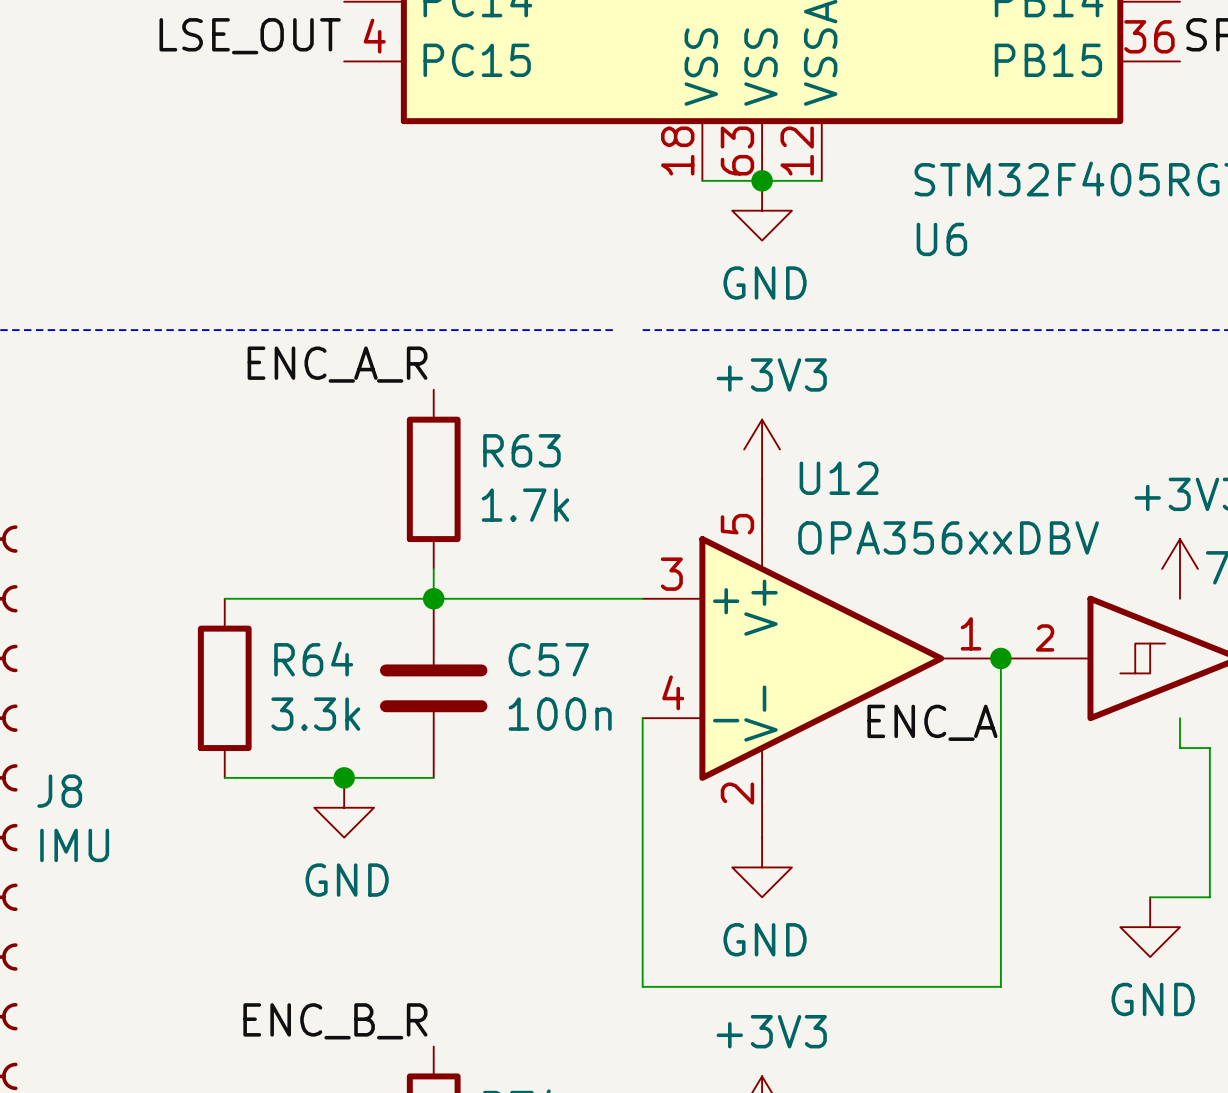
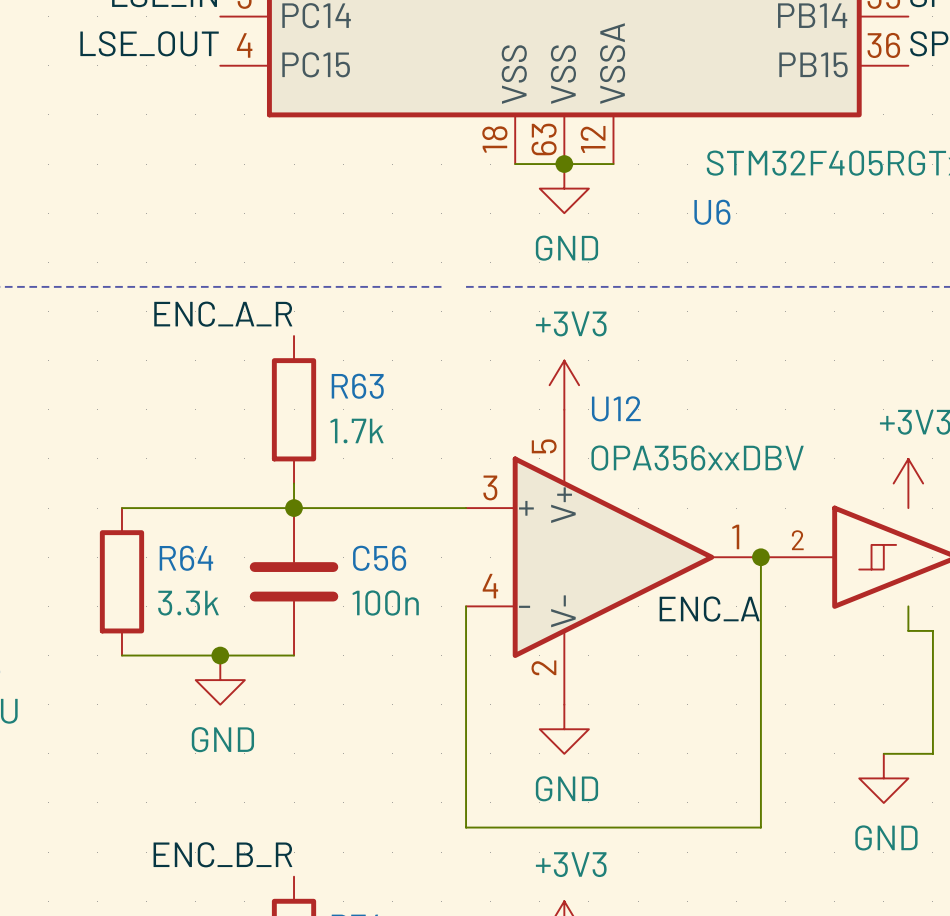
C57 name: C57 (548, 659) -> C56 (379, 558)

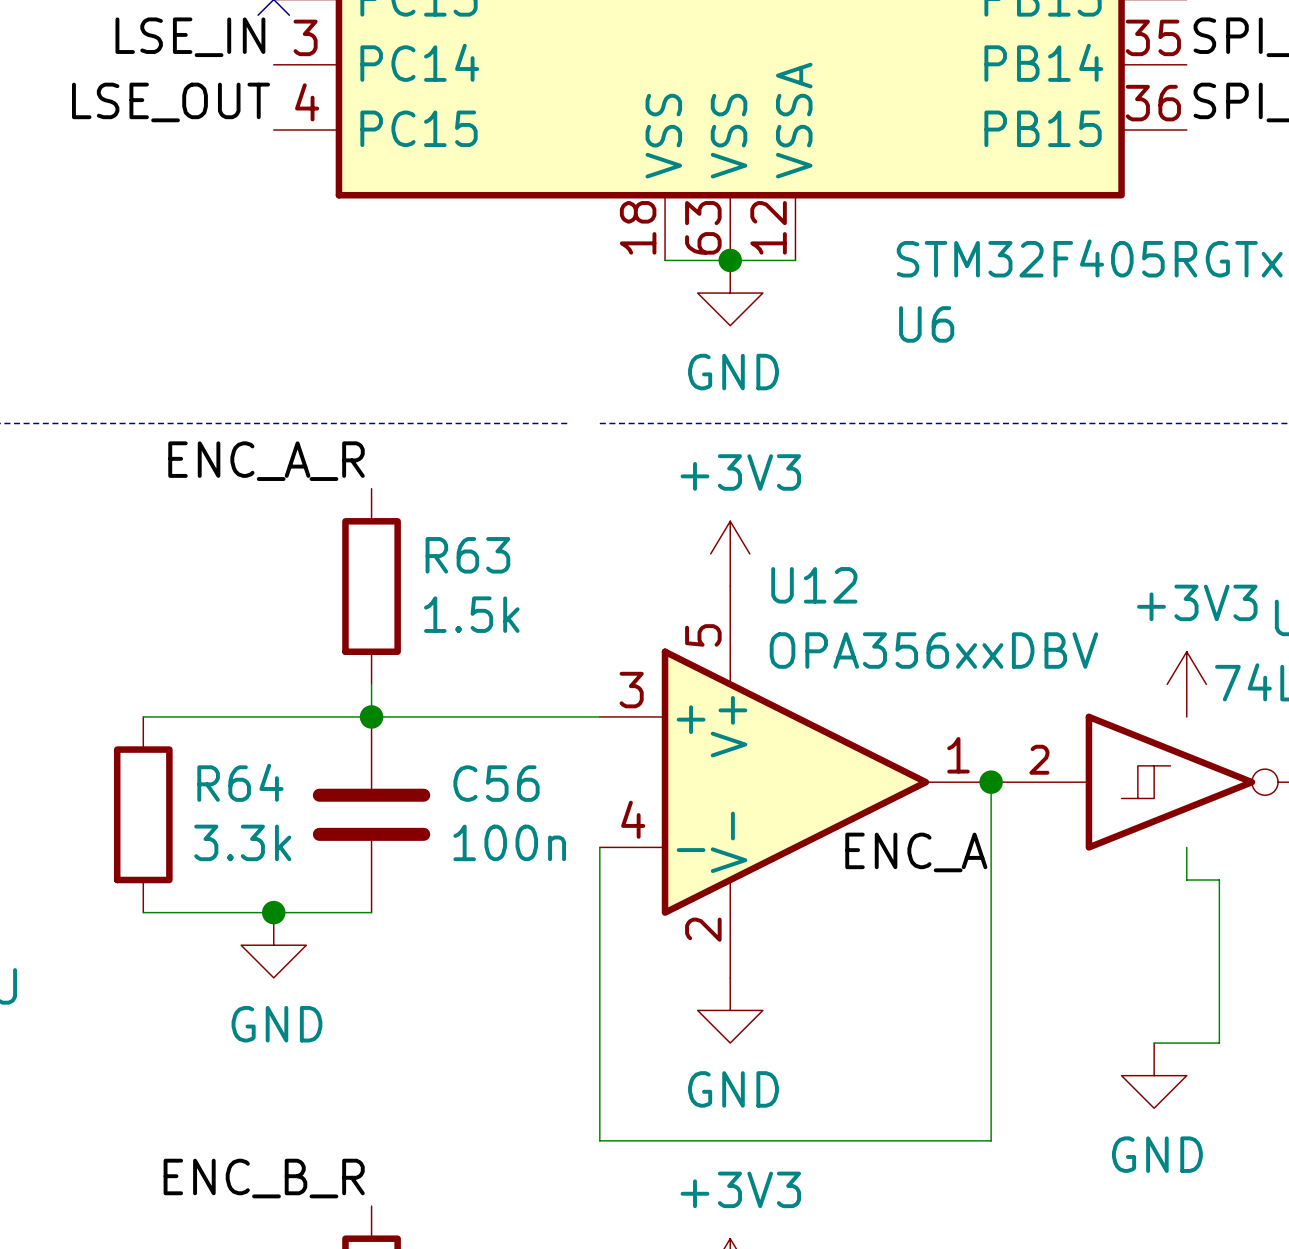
R63 value: 1.7k (357, 431) -> 1.5k (471, 614)

